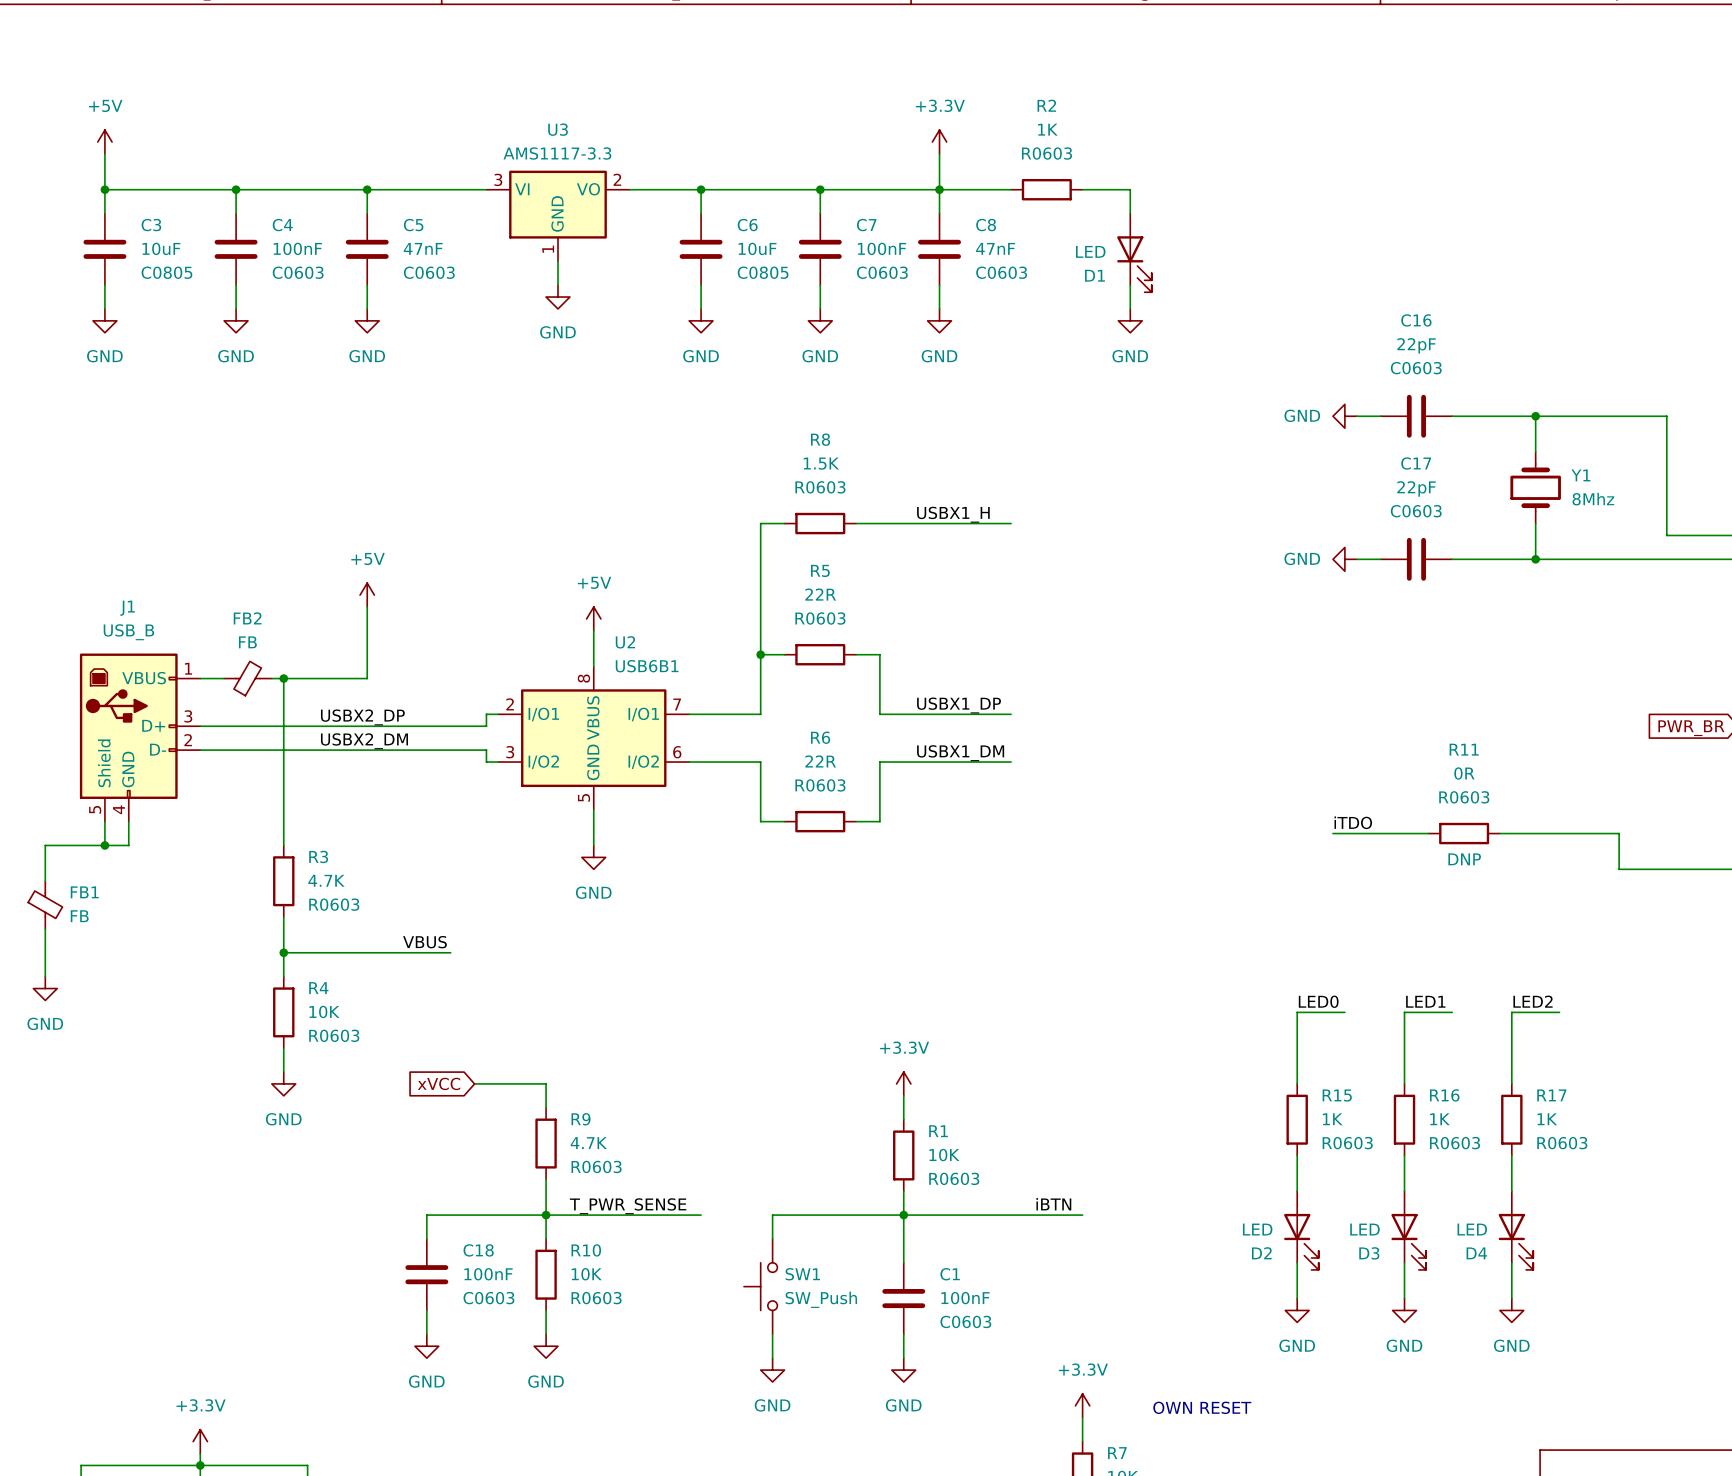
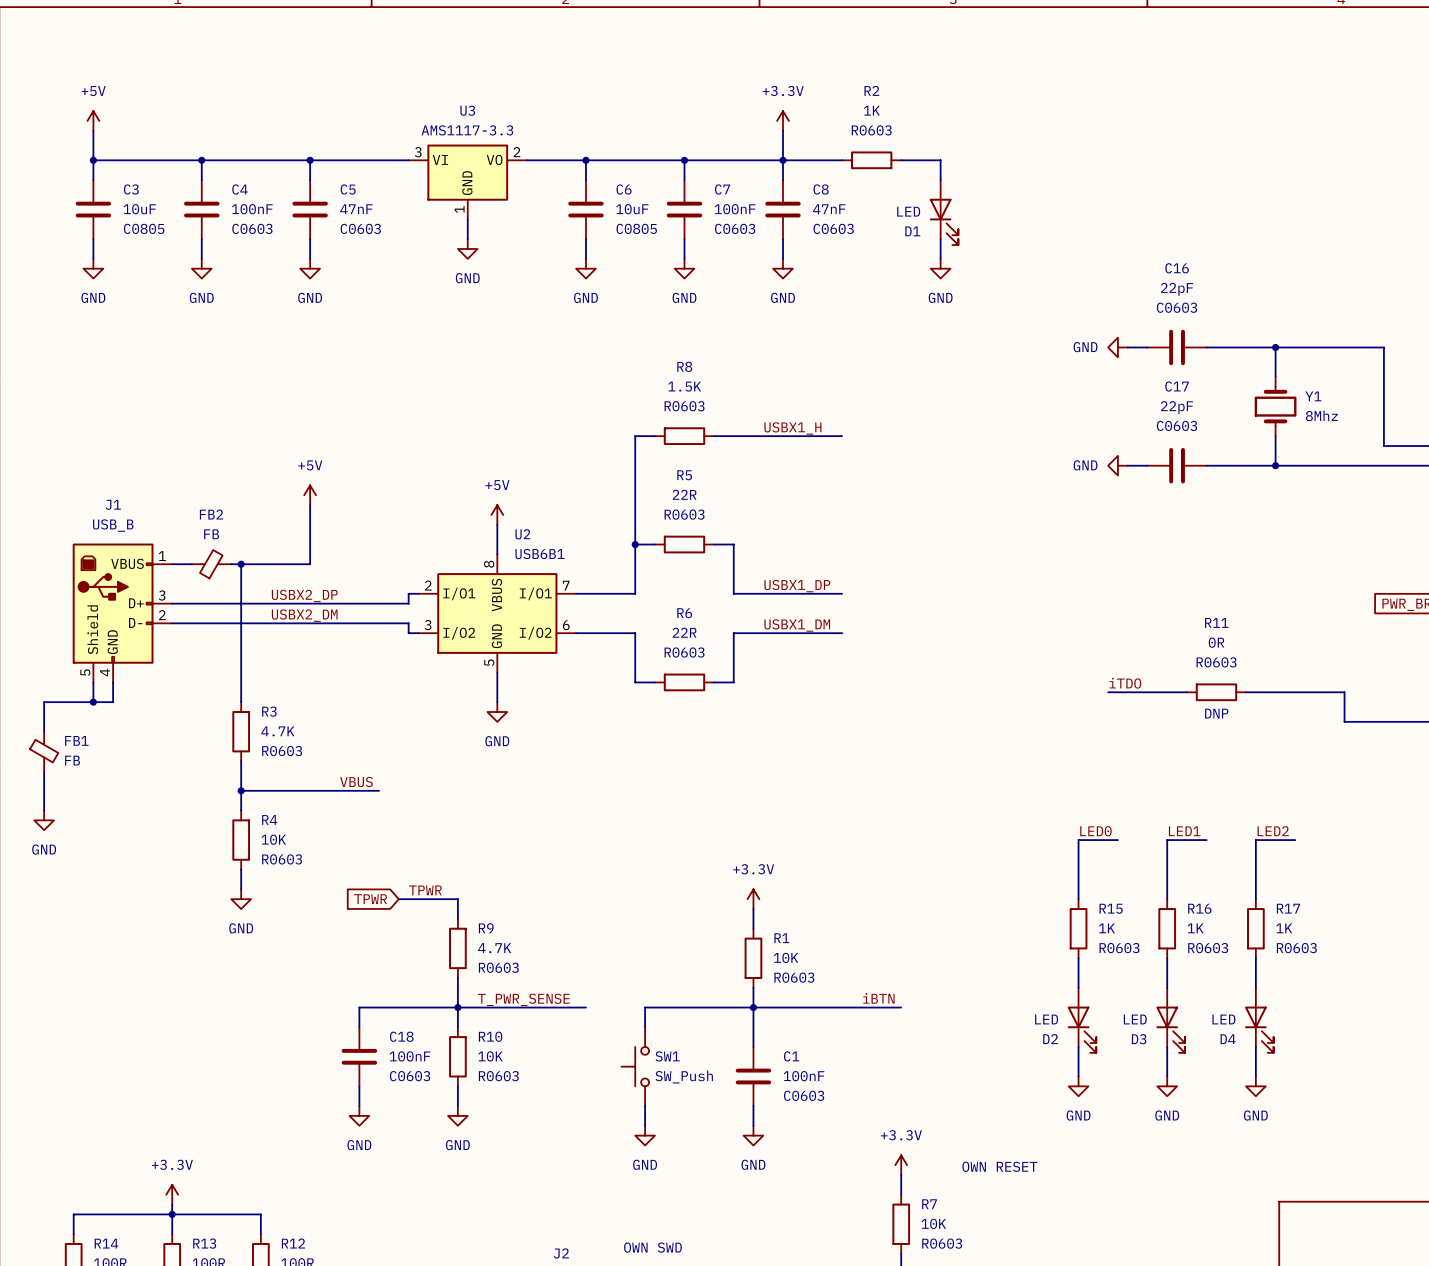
label: none -> TPWR (425, 890)
global label: xVCC (439, 1083) -> TPWR (370, 899)

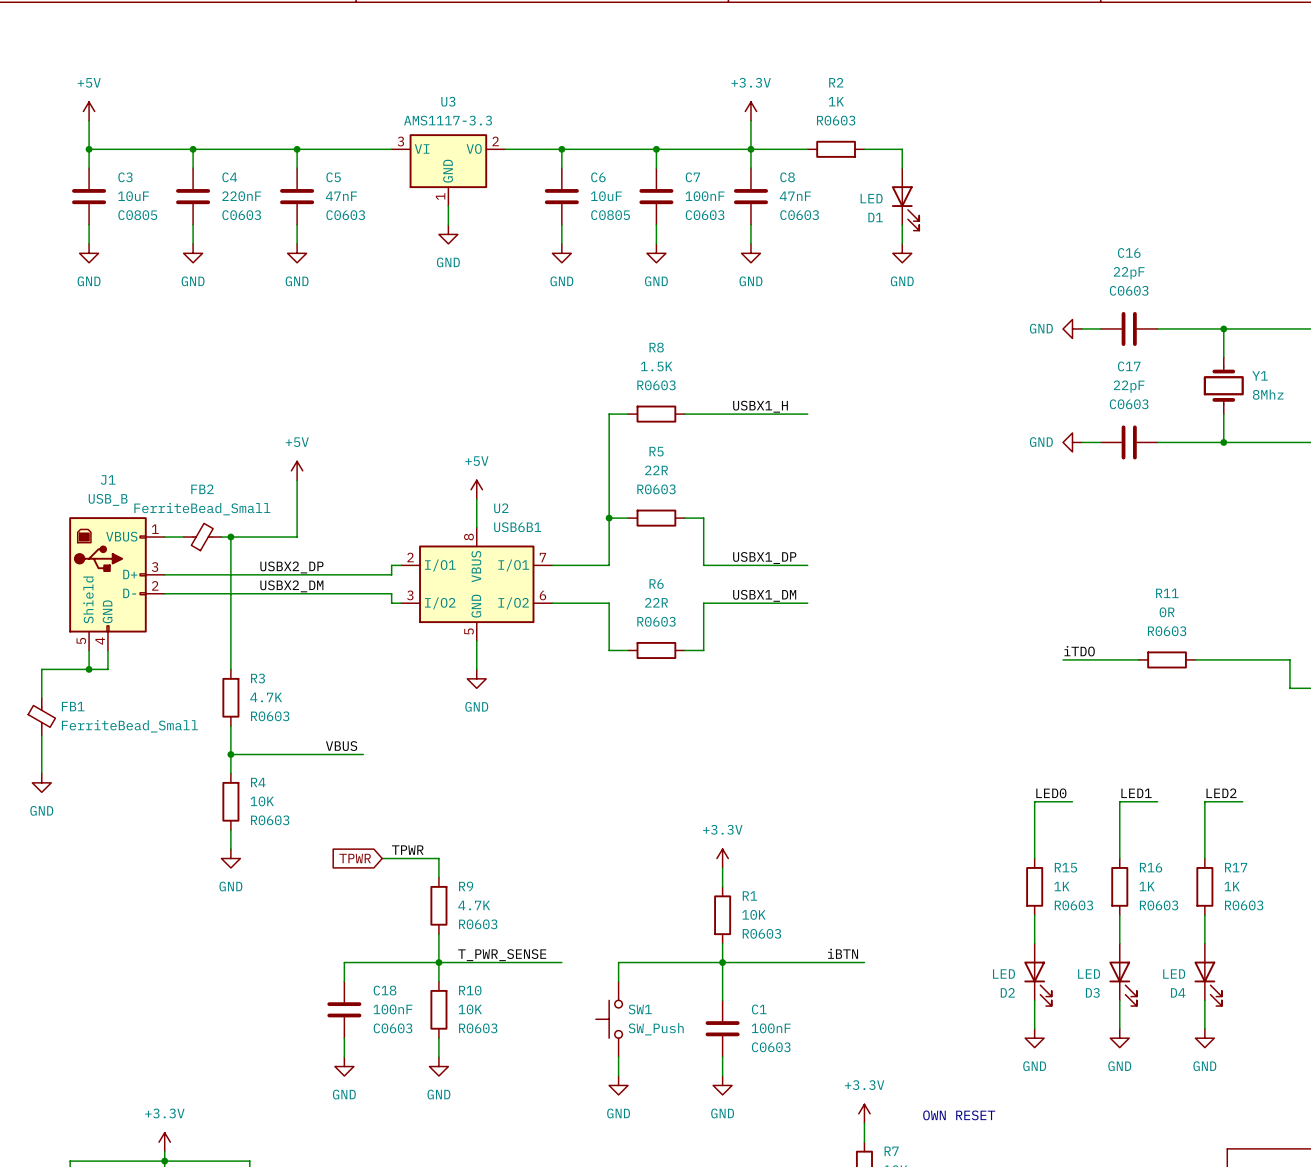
C4 value: 100nF (252, 209) -> 220nF (241, 196)
FB2 value: FB (211, 534) -> FerriteBead_Small (202, 509)
R11 text: DNP (1216, 713) -> none
FB1 value: FB (72, 760) -> FerriteBead_Small (129, 726)

